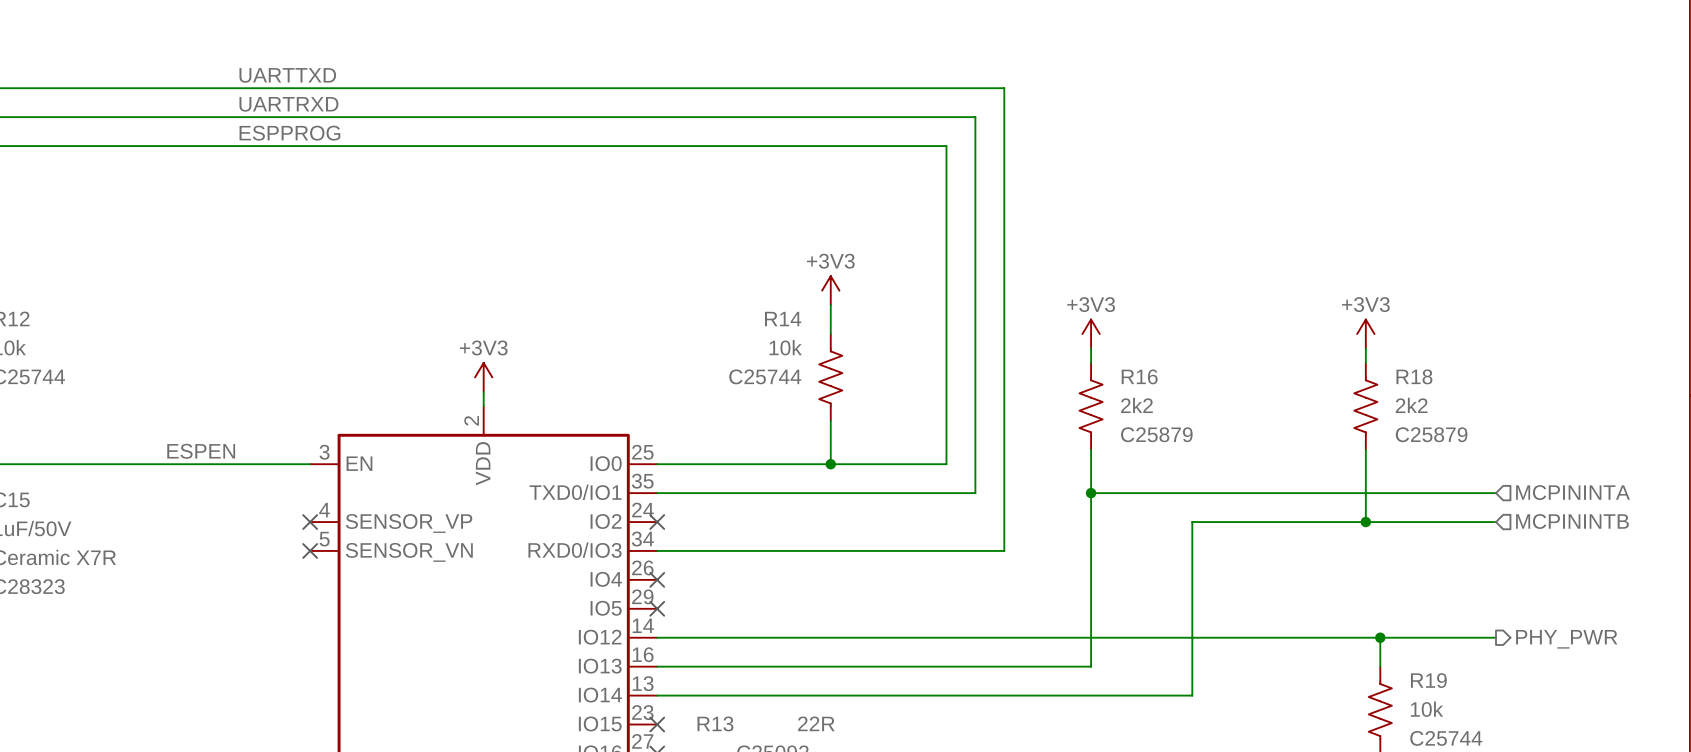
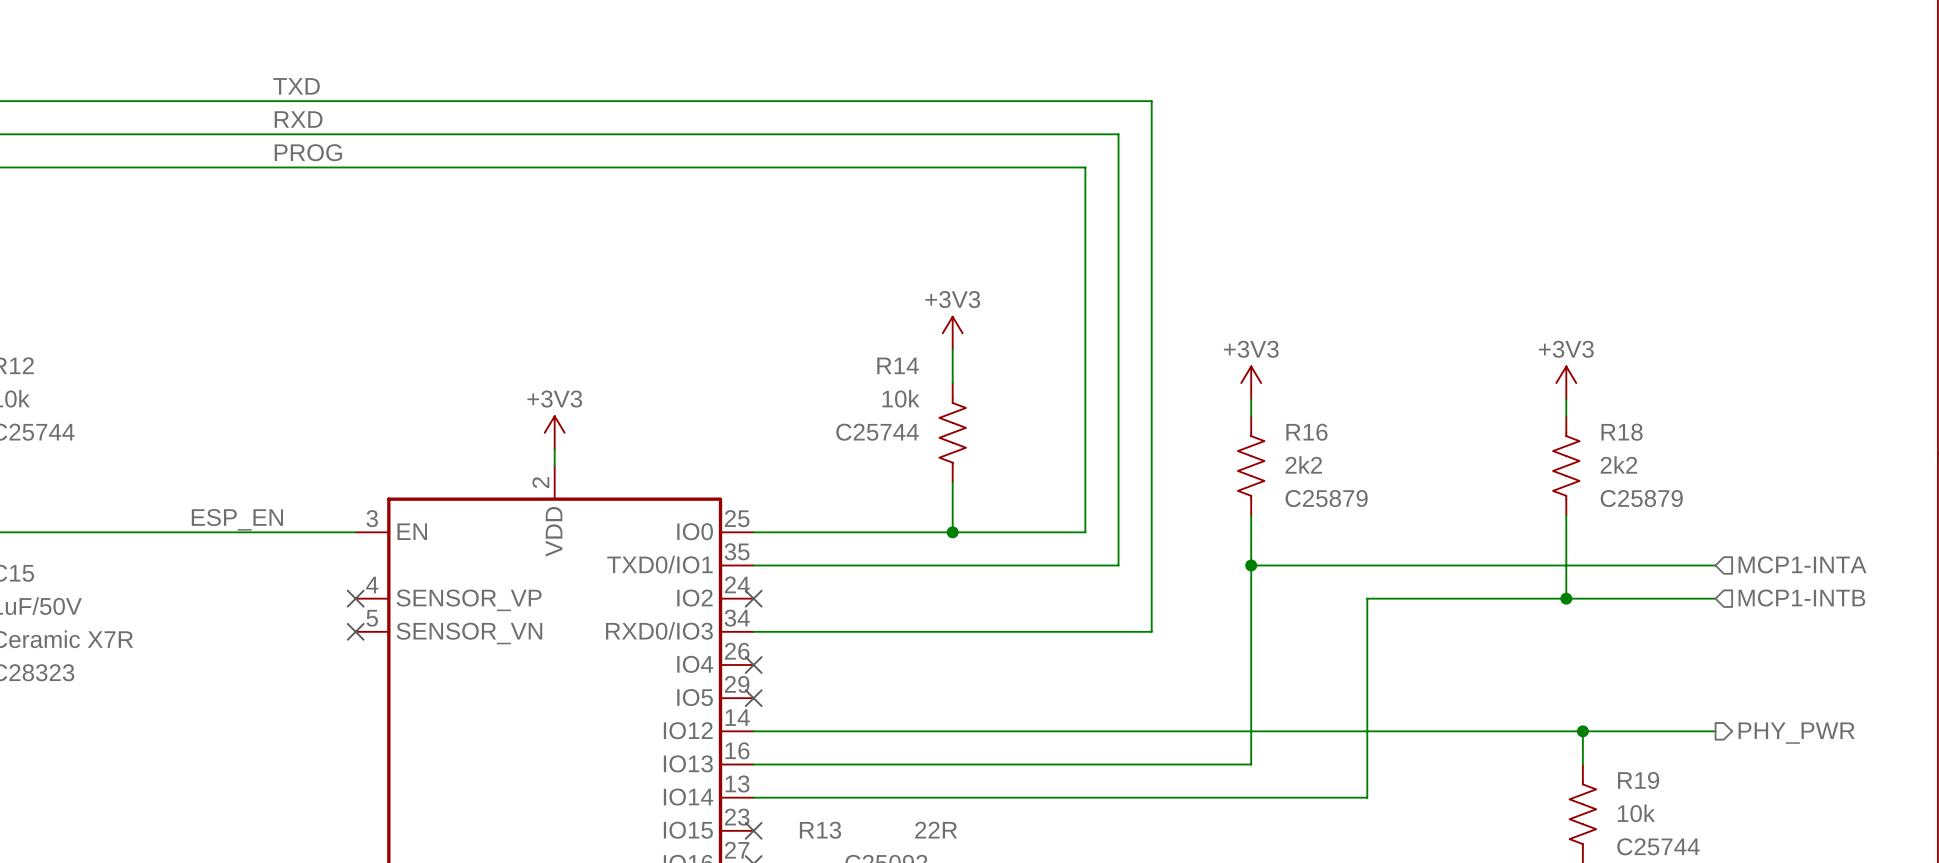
label: UARTTXD (287, 75) -> TXD (296, 86)
label: UARTRXD (288, 104) -> RXD (298, 119)
label: ESPPROG (289, 133) -> PROG (308, 152)
label: ESPEN (201, 451) -> ESP_EN (237, 519)
hierarchical label: MCPININTA (1573, 492) -> MCP1-INTA (1802, 564)
hierarchical label: MCPININTB (1572, 521) -> MCP1-INTB (1801, 598)

